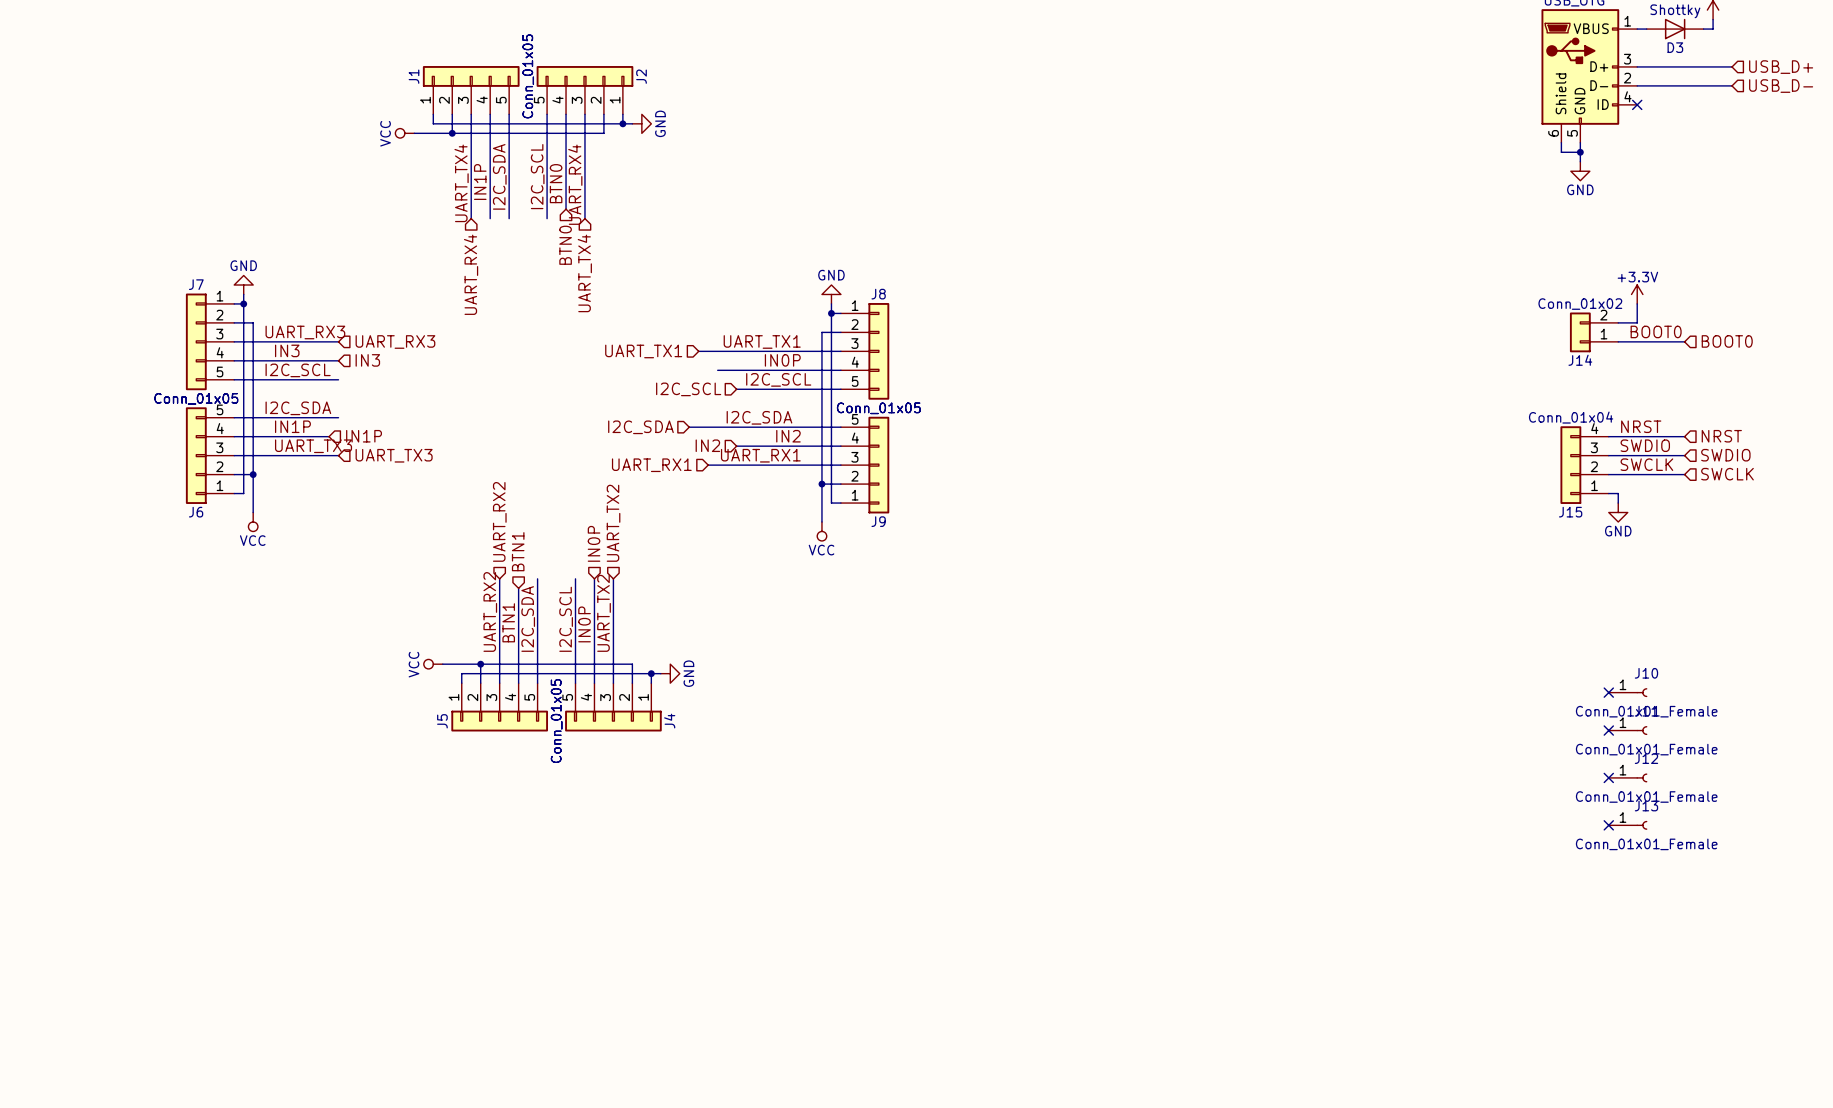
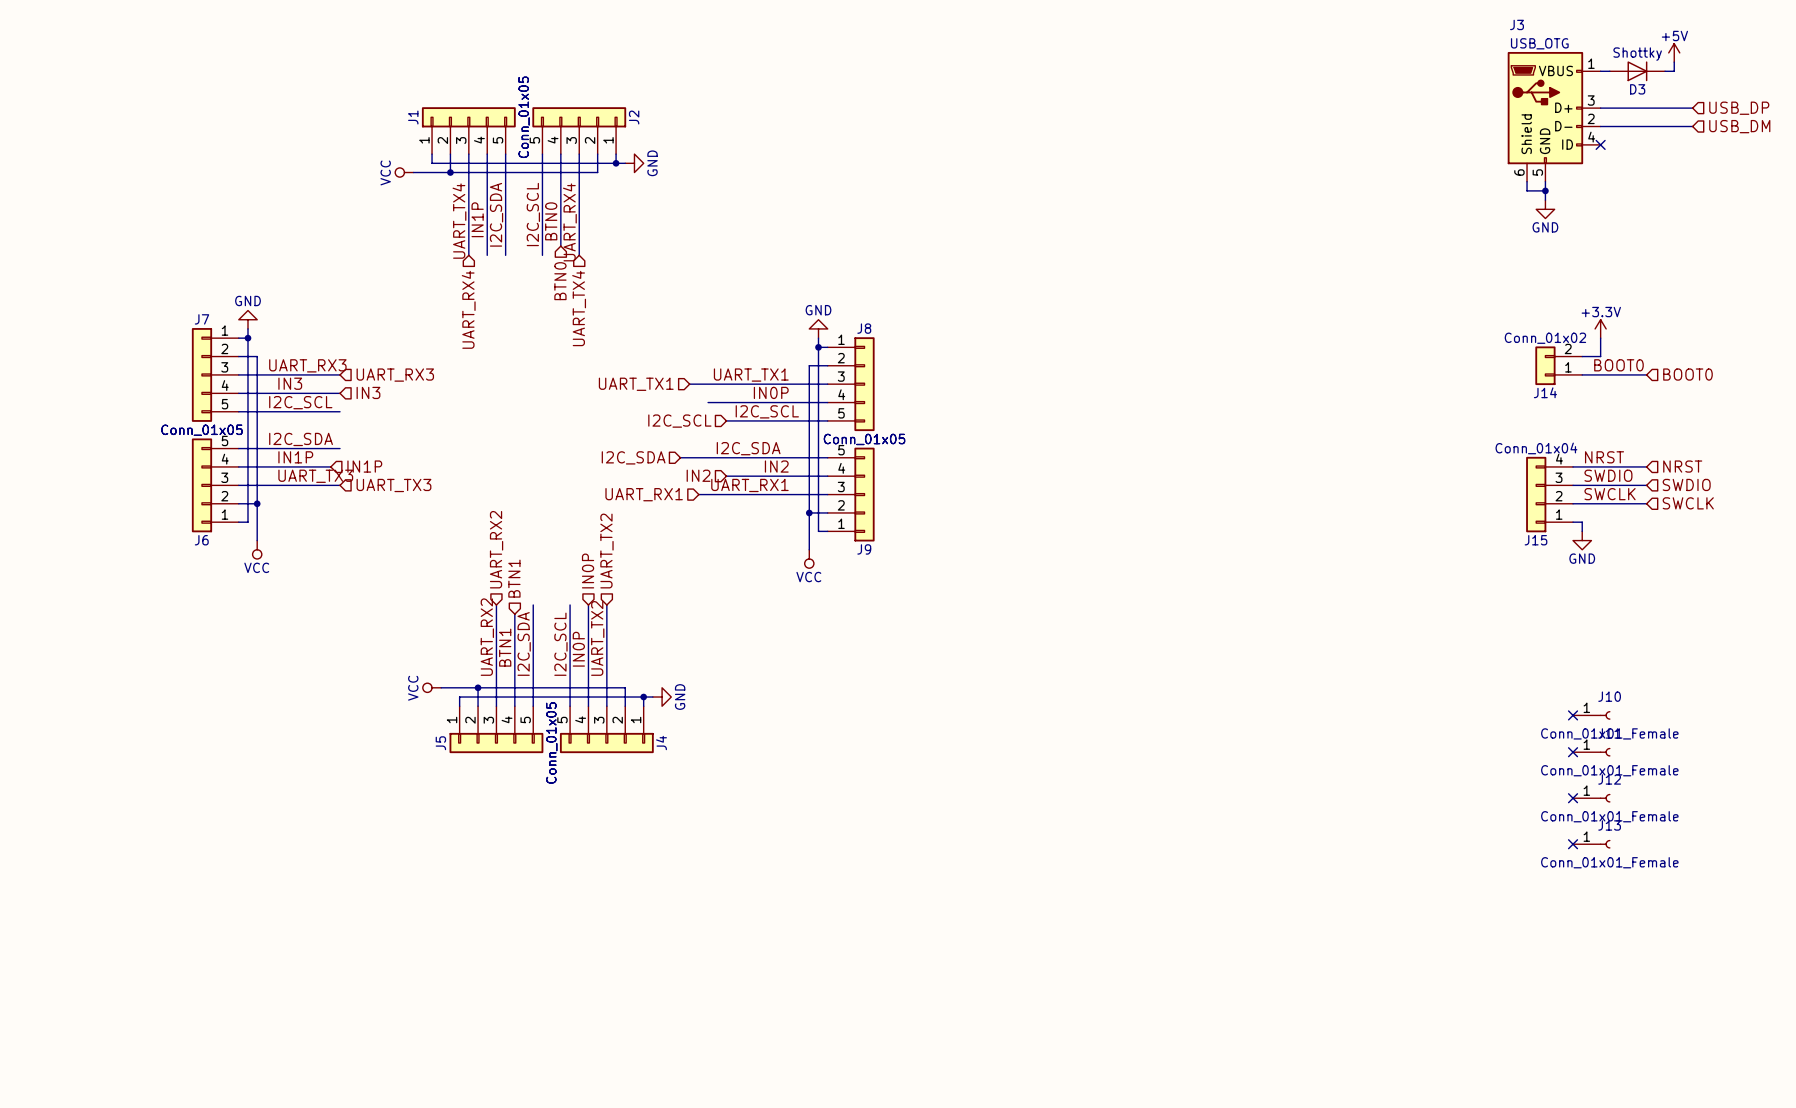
hierarchical label: USB_D+ (1781, 67) -> USB_DP (1739, 108)
hierarchical label: USB_D- (1781, 86) -> USB_DM (1739, 126)

